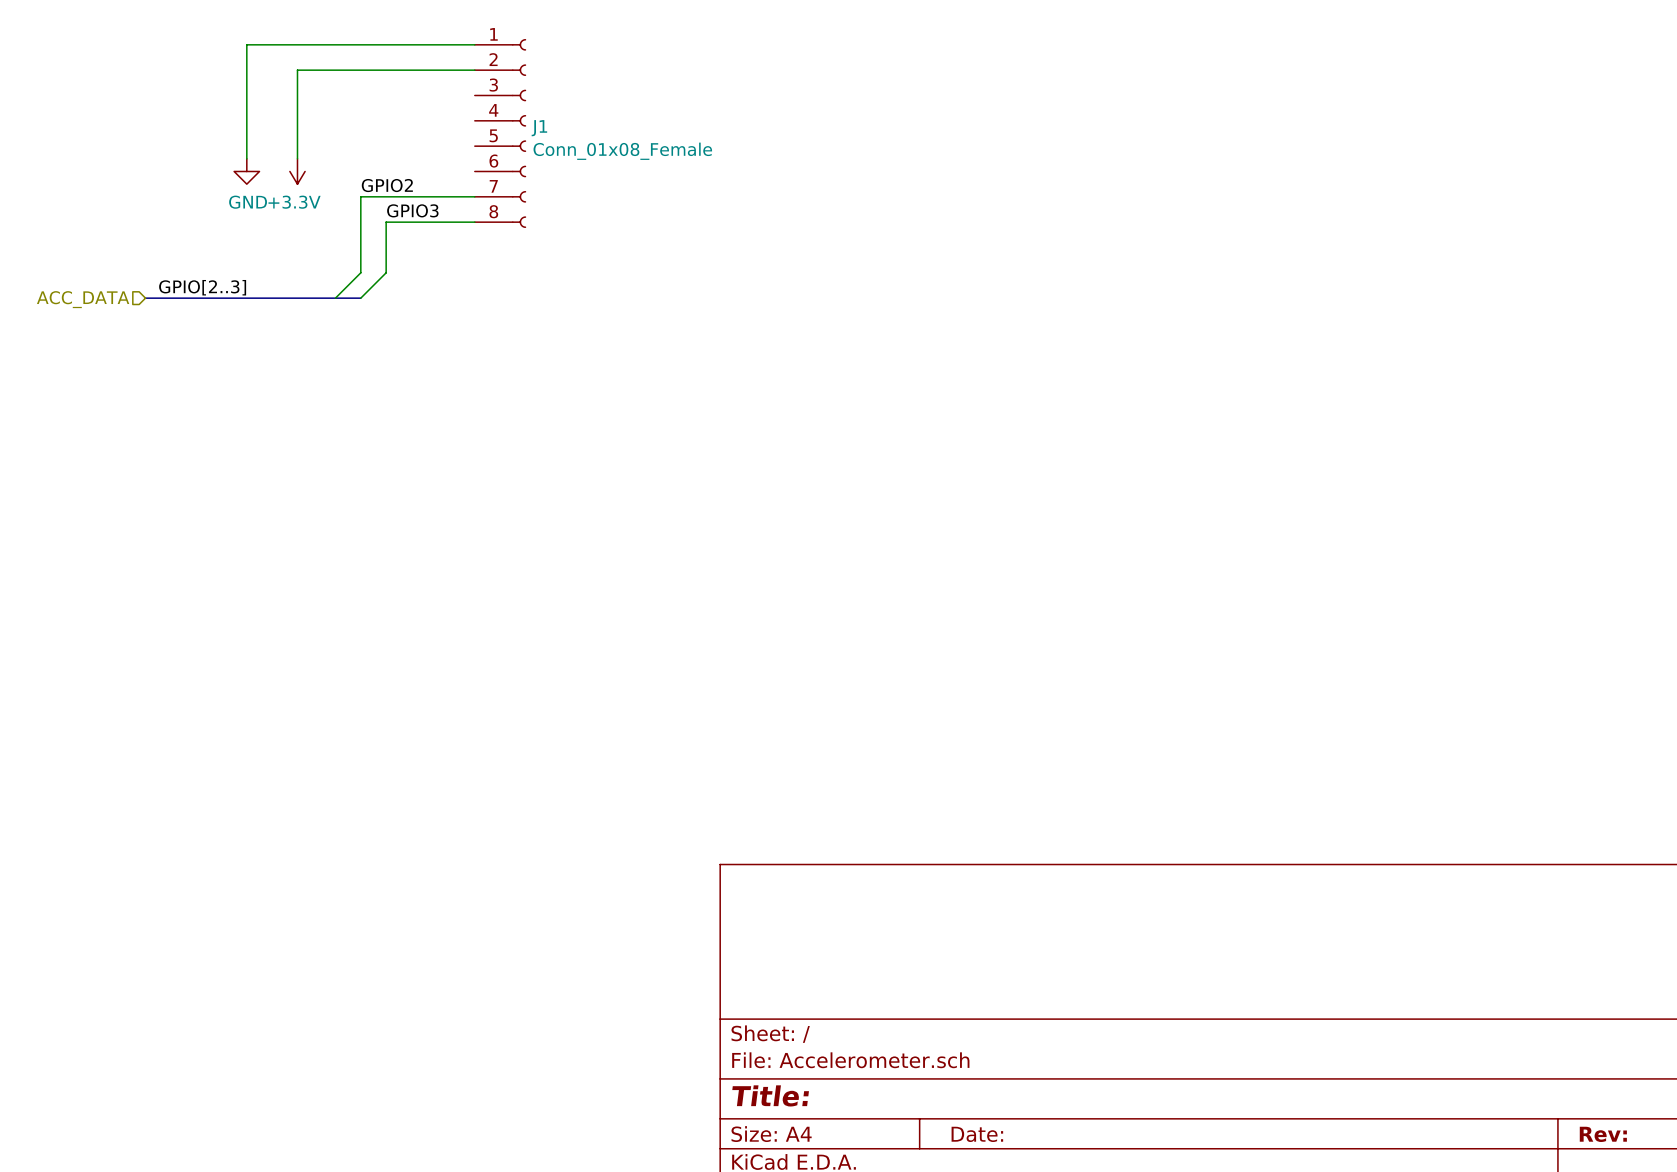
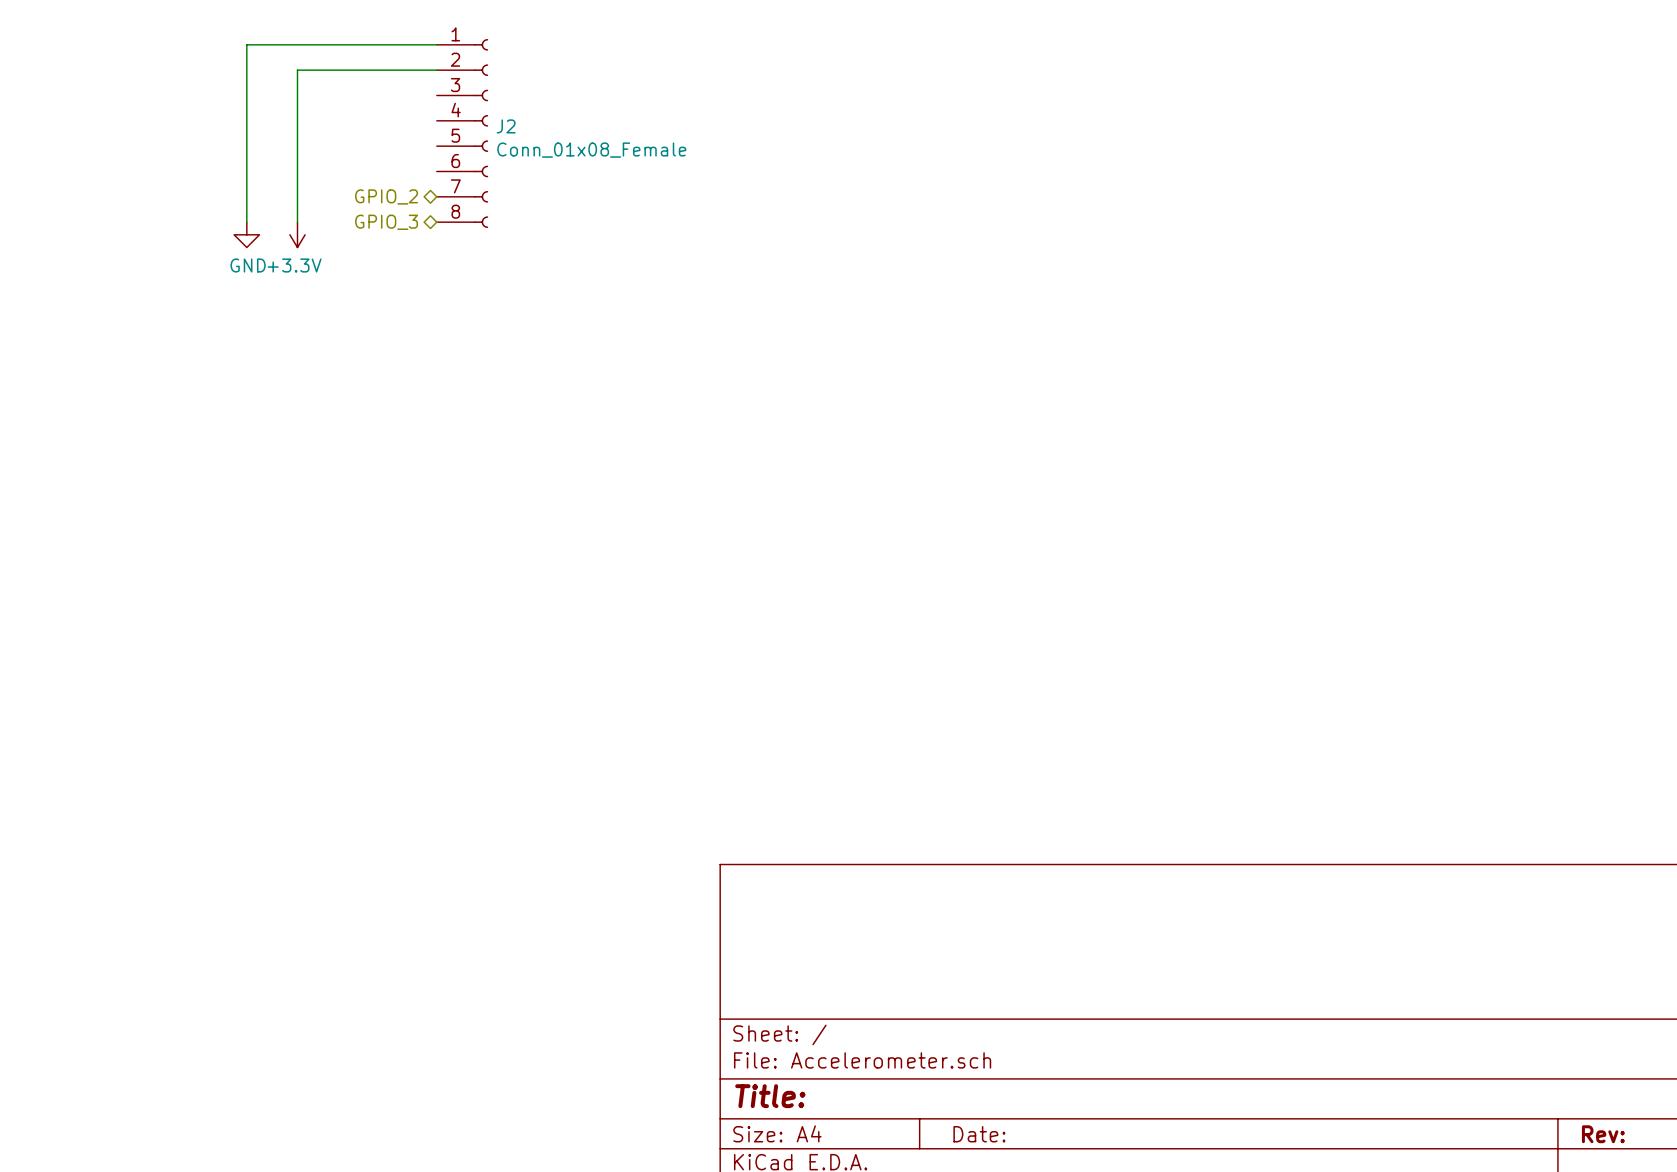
J2: none -> Conn_01x08_Female (462, 133)
J1: Conn_01x08_Female (500, 133) -> none
wire: none -> (246, 158) (246, 222)
wire: none -> (297, 158) (297, 222)
power symbol position: GND (246, 171) -> GND (246, 234)
power symbol position: +3.3V (297, 171) -> +3.3V (297, 234)
label: GPIO2 (387, 185) -> none
wire: (474, 196) (360, 196) (360, 272) (335, 298) -> none
hierarchical label: none -> GPIO_2 (386, 196)
label: GPIO3 (412, 210) -> none
wire: (474, 222) (386, 222) (386, 272) (360, 298) -> none
hierarchical label: none -> GPIO_3 (386, 222)
label: GPIO[2..3] (202, 287) -> none
bus: (145, 298) (360, 298) -> none
hierarchical label: ACC_DATA (83, 299) -> none

